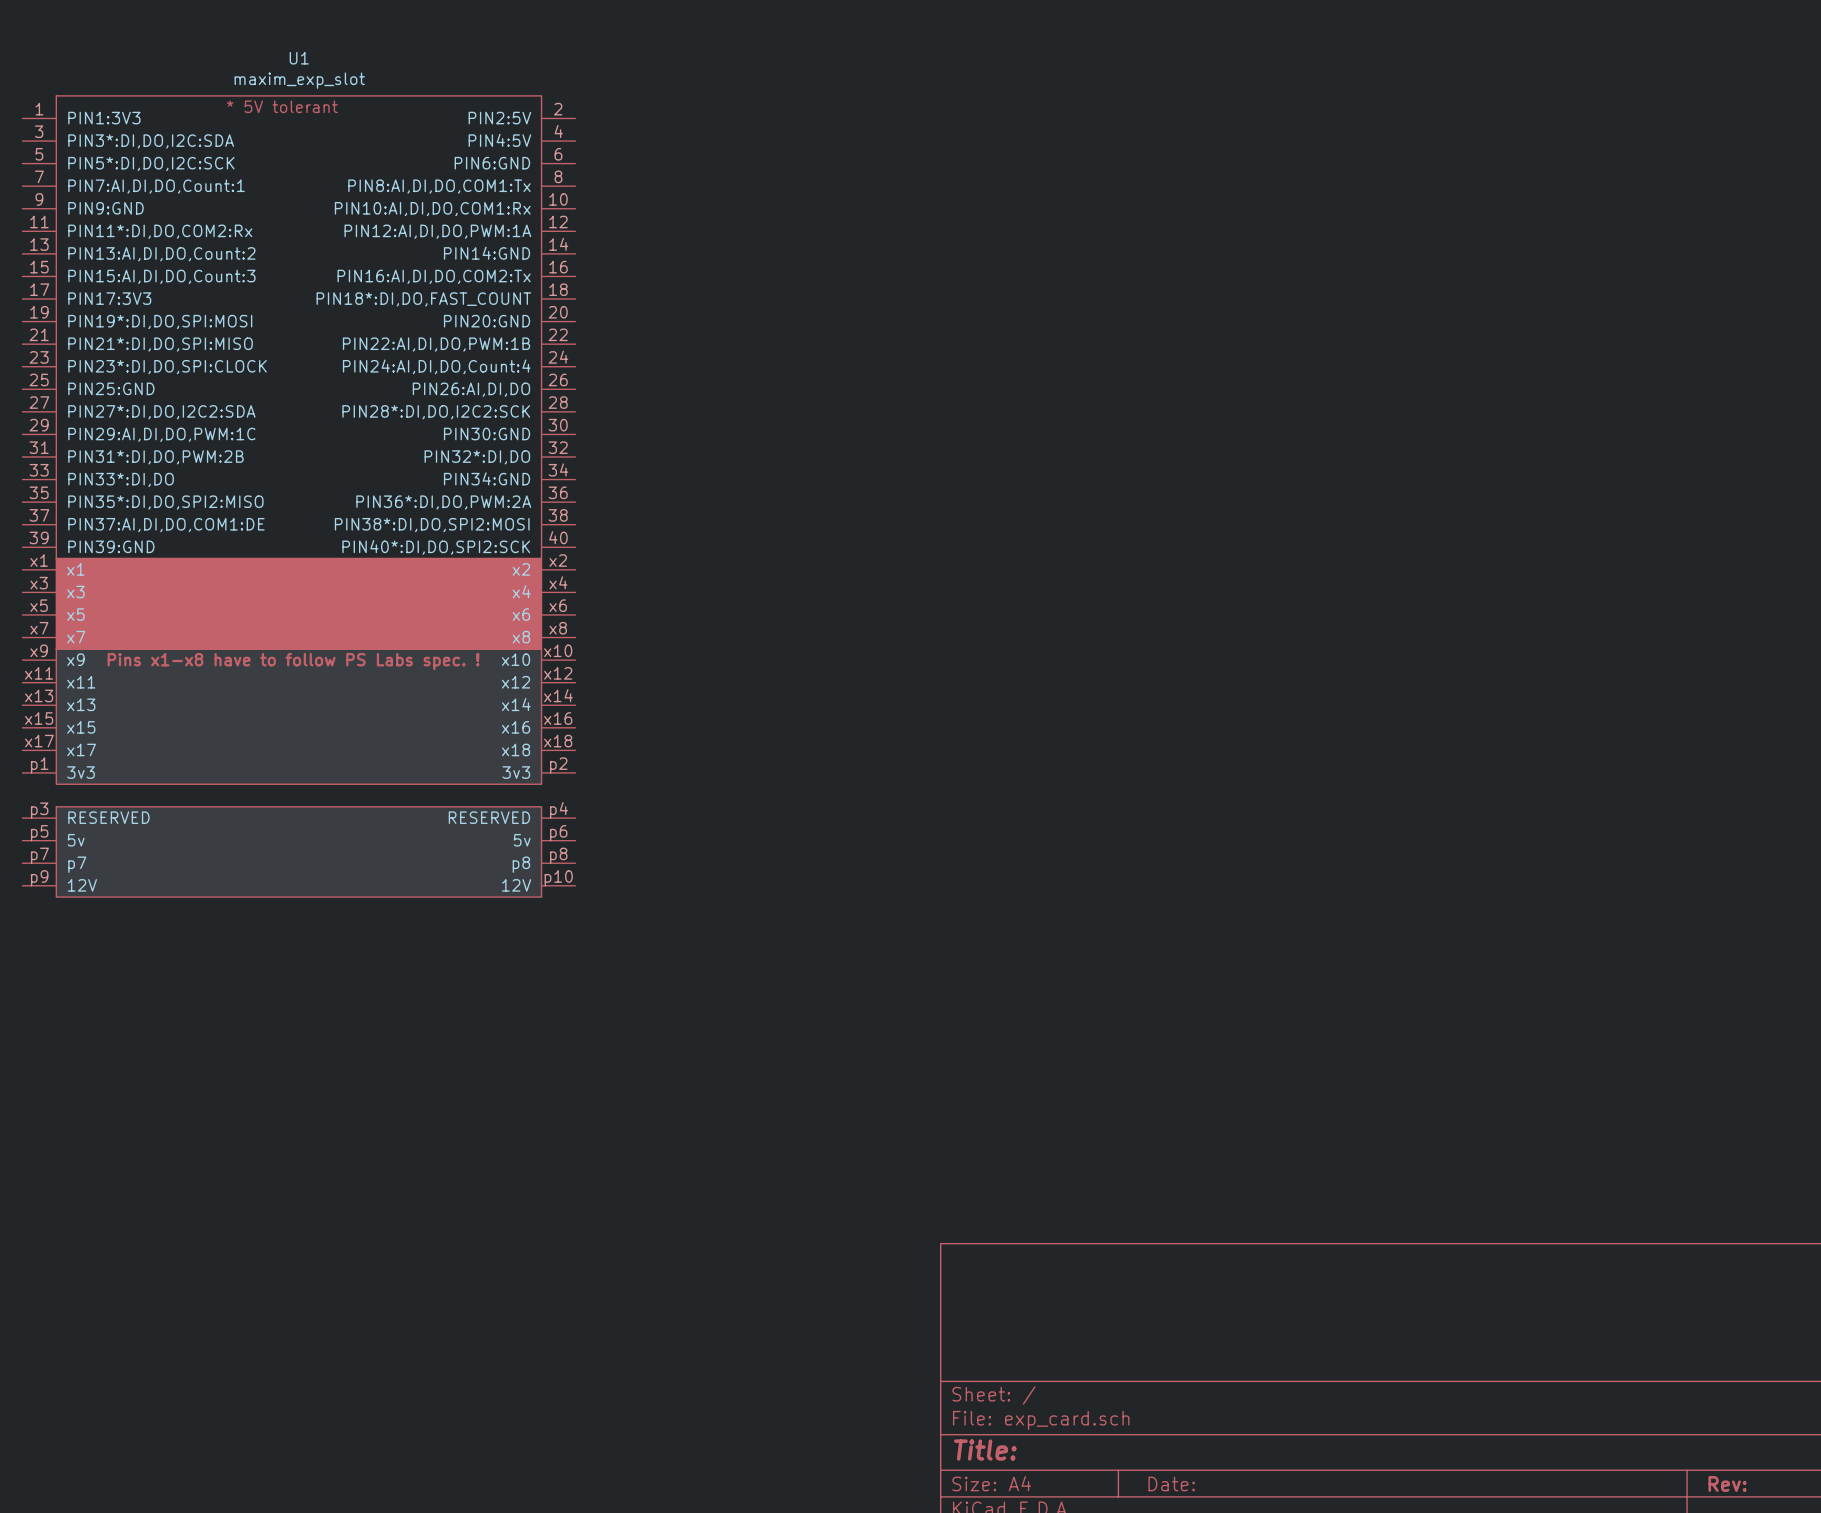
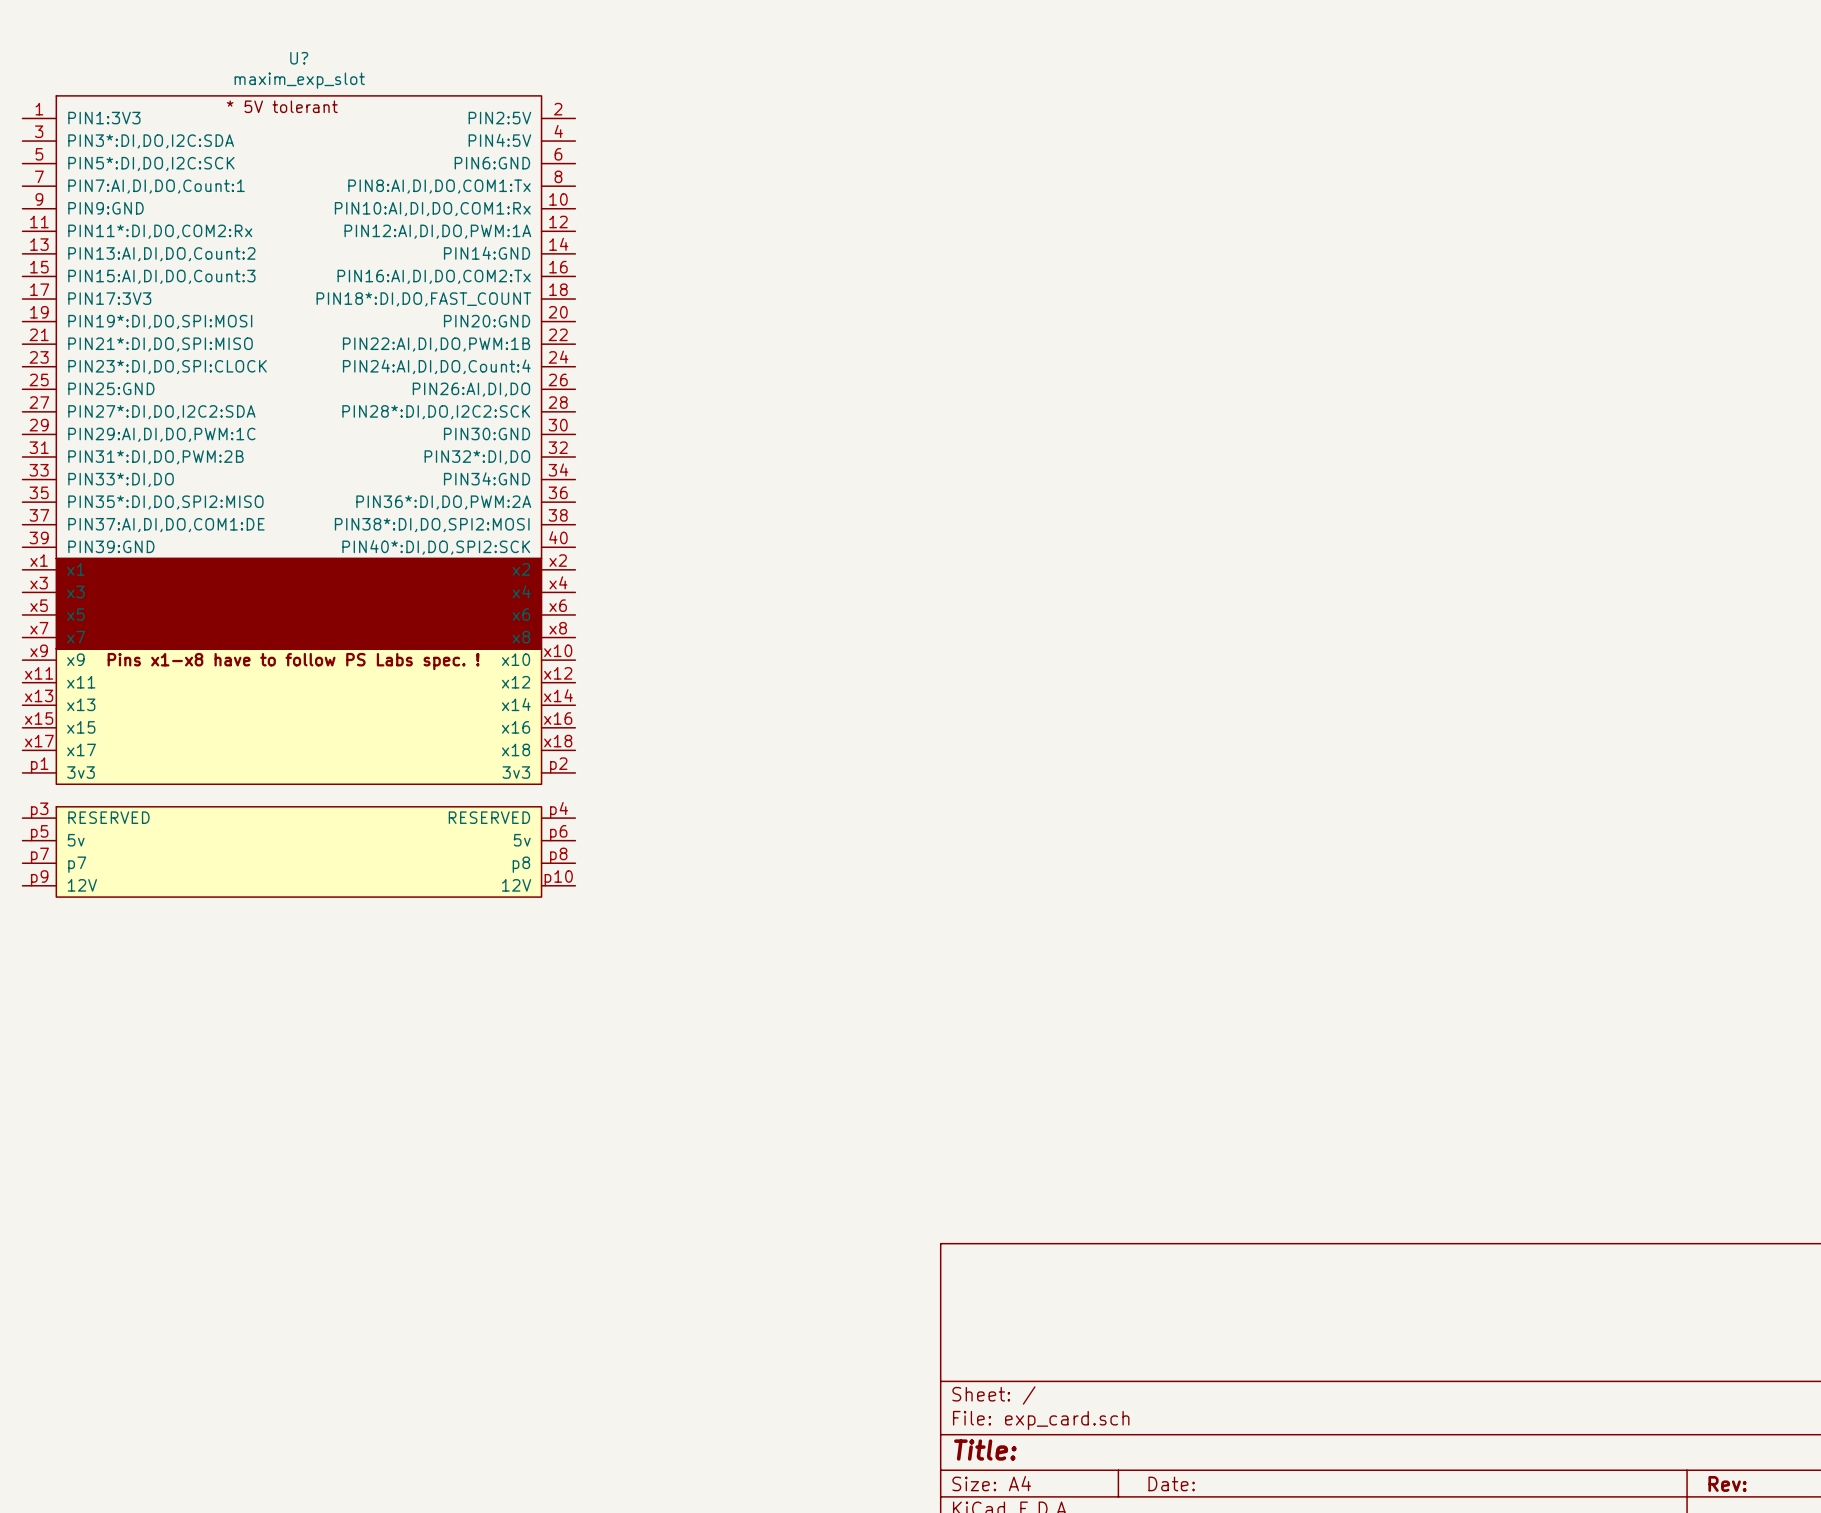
U1 name: U1 (299, 58) -> U? (299, 58)

